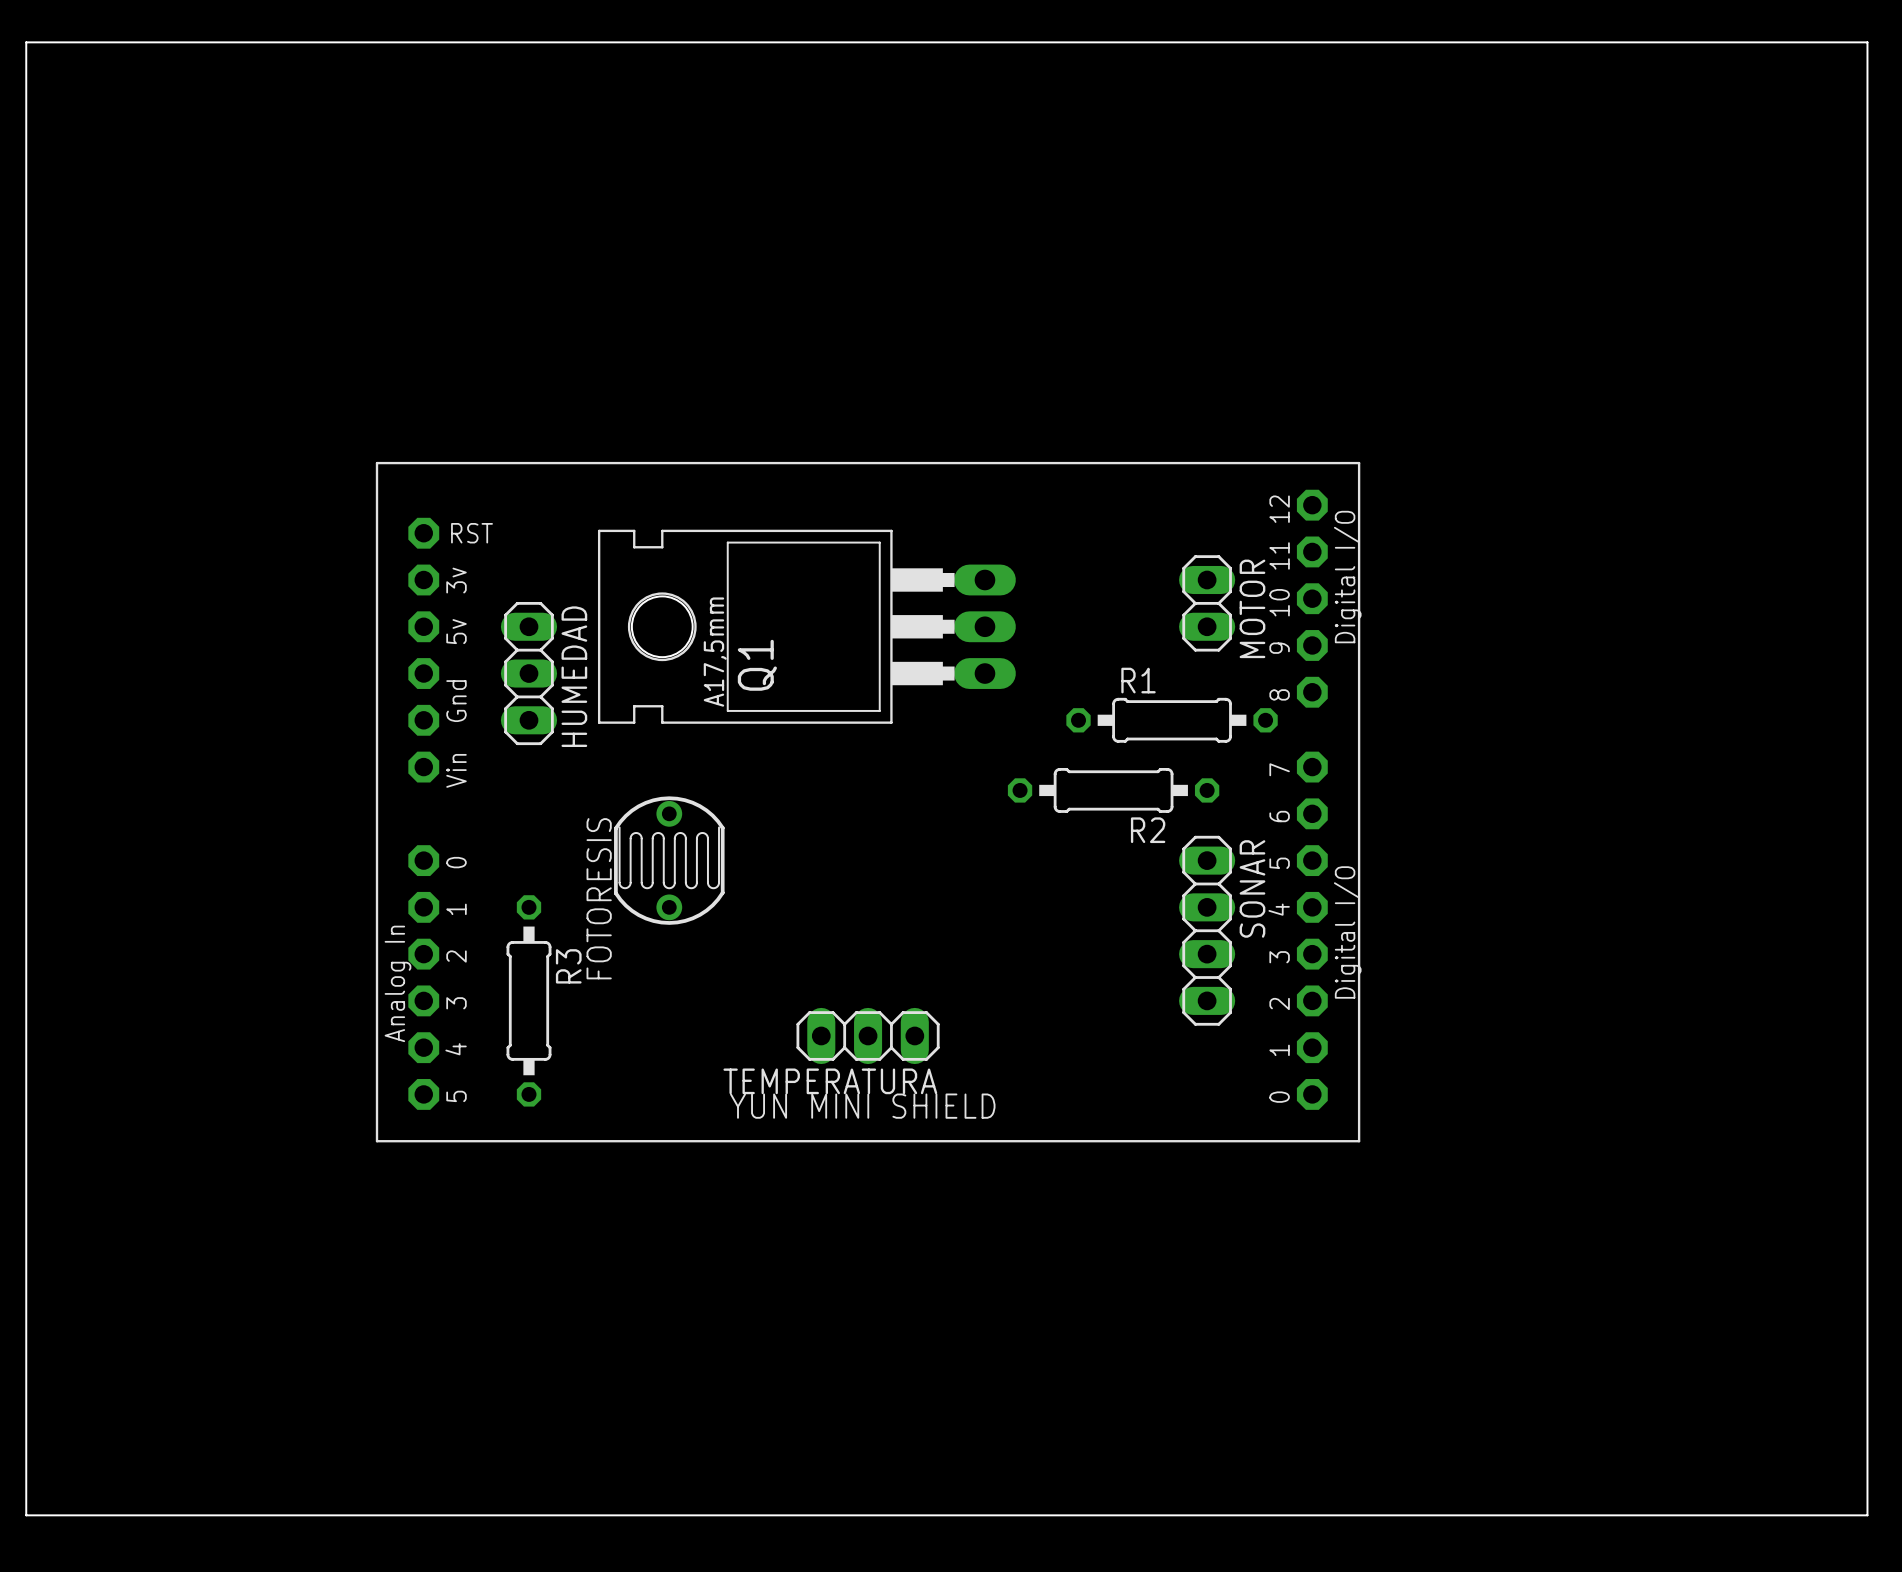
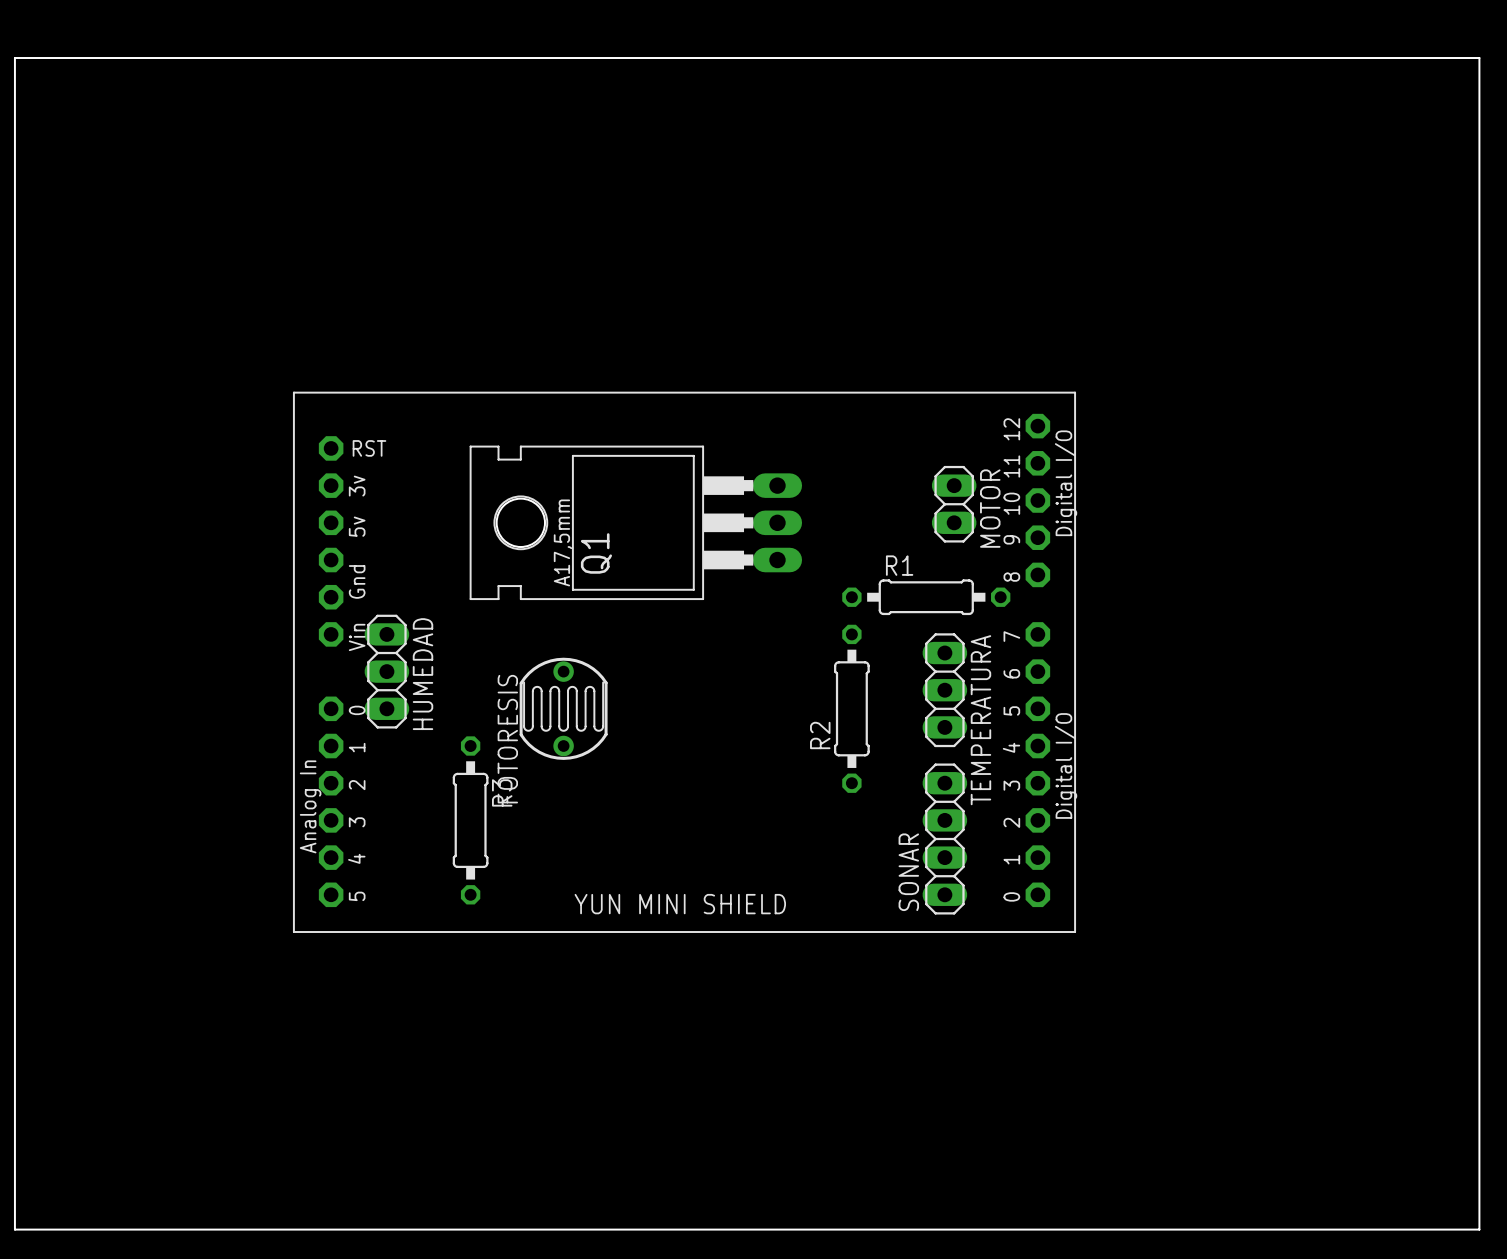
HUMEDAD position: (528, 673) -> (386, 671)
R2 rotation: 0° (1113, 790) -> 90° clockwise (851, 708)
FOTORESIS position: (669, 860) -> (563, 708)
SONAR name position: SONAR (1252, 888) -> SONAR (908, 872)
SONAR position: (1207, 930) -> (944, 839)
R3 position: (528, 1000) -> (470, 820)
TEMPERATURA rotation: 0° (868, 1035) -> 90° clockwise (944, 690)
TEMPERATURA position: (868, 1035) -> (944, 690)
TEMPERATURA name position: TEMPERATURA (830, 1081) -> TEMPERATURA (980, 720)

